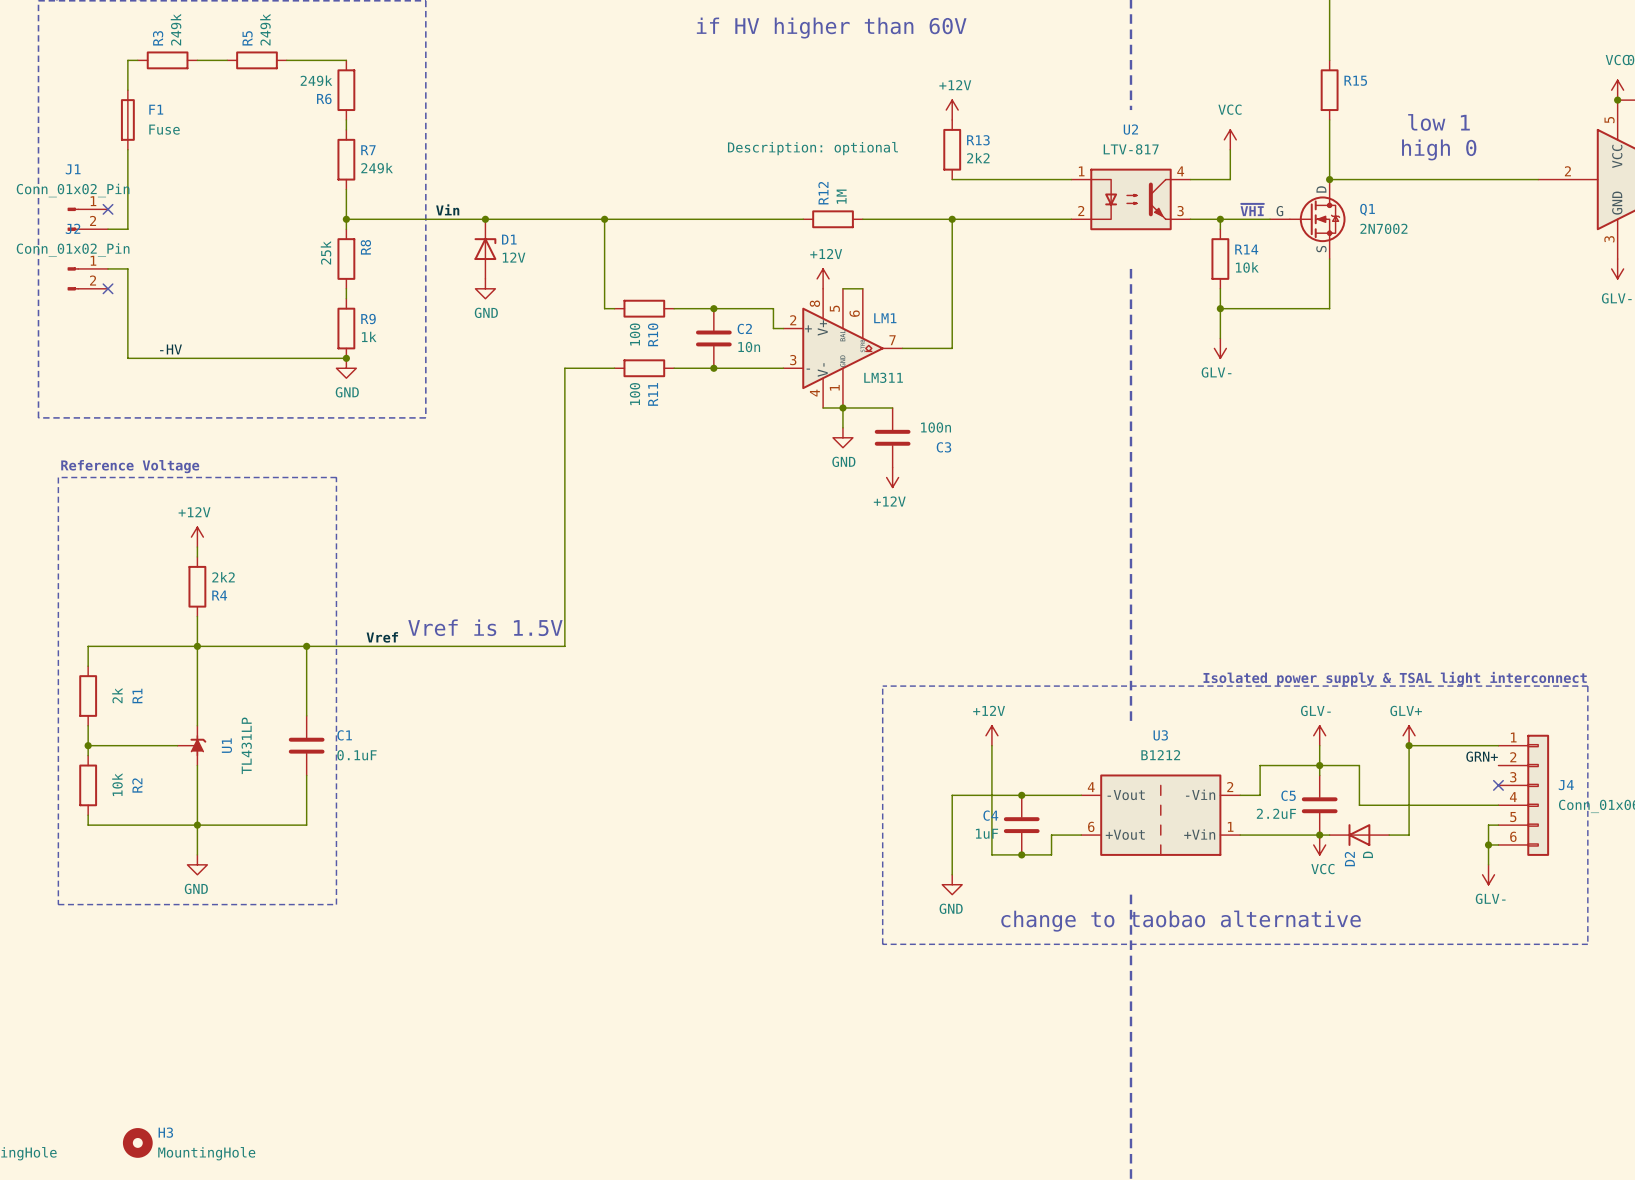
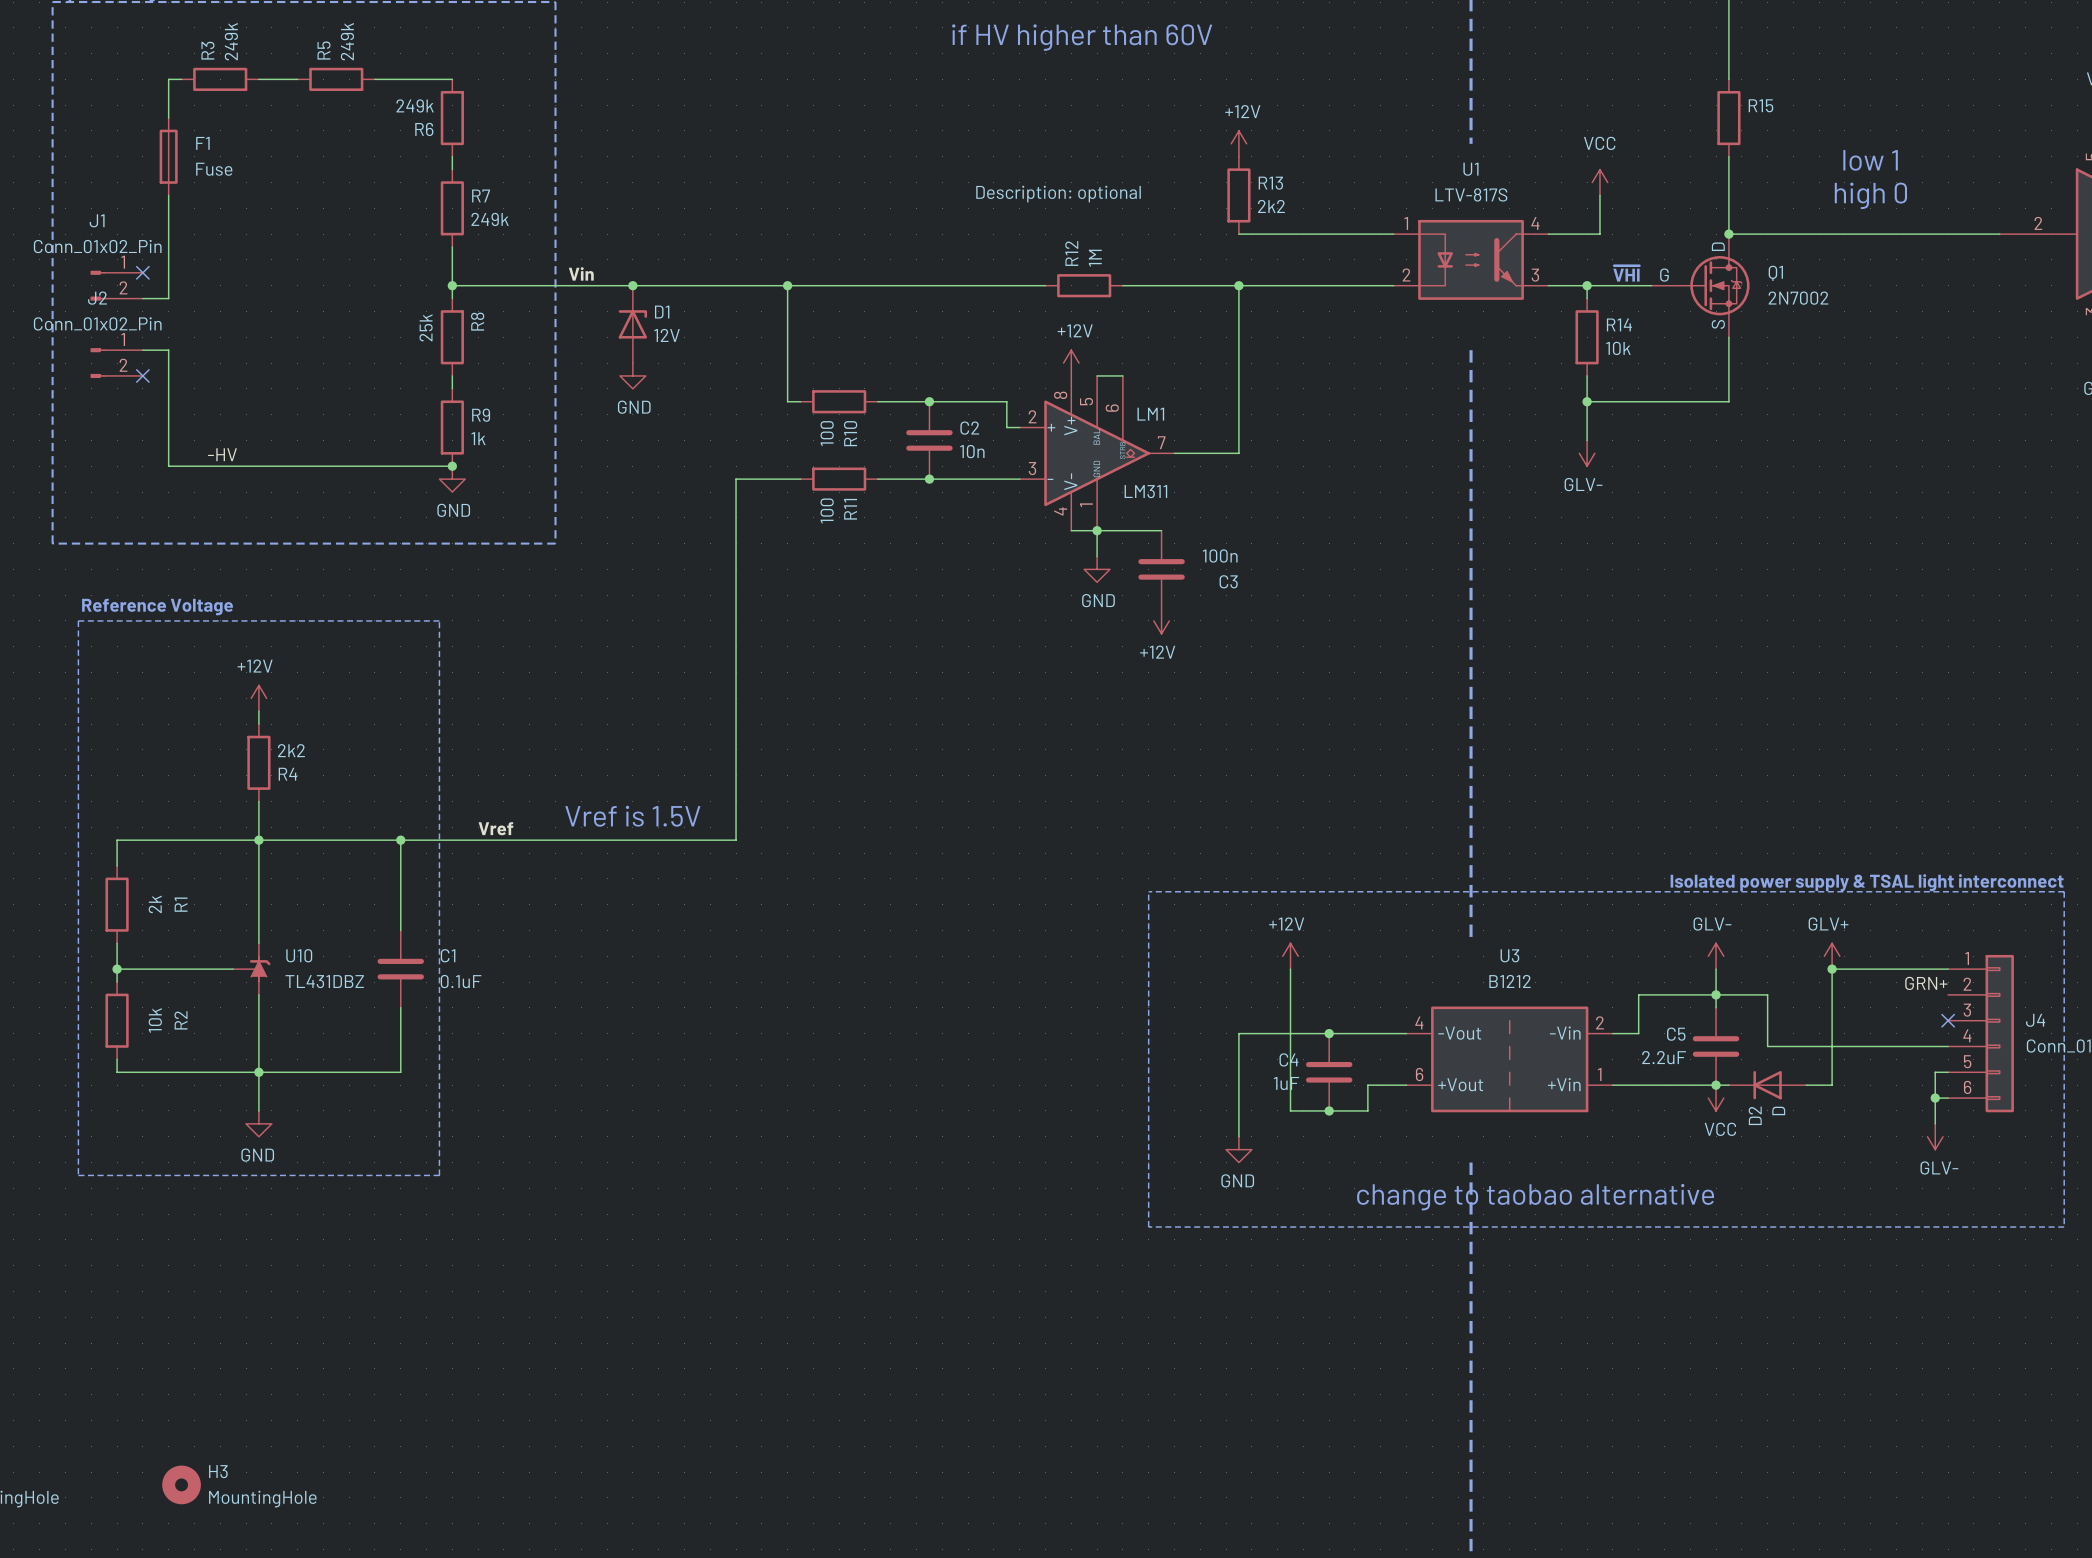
U2 name: U2 (1130, 129) -> U1 (1470, 169)
U2 value: LTV-817 (1131, 149) -> LTV-817S (1471, 194)
U1 name: U1 (226, 745) -> U10 (299, 955)
U1 value: TL431LP (246, 745) -> TL431DBZ (324, 981)

